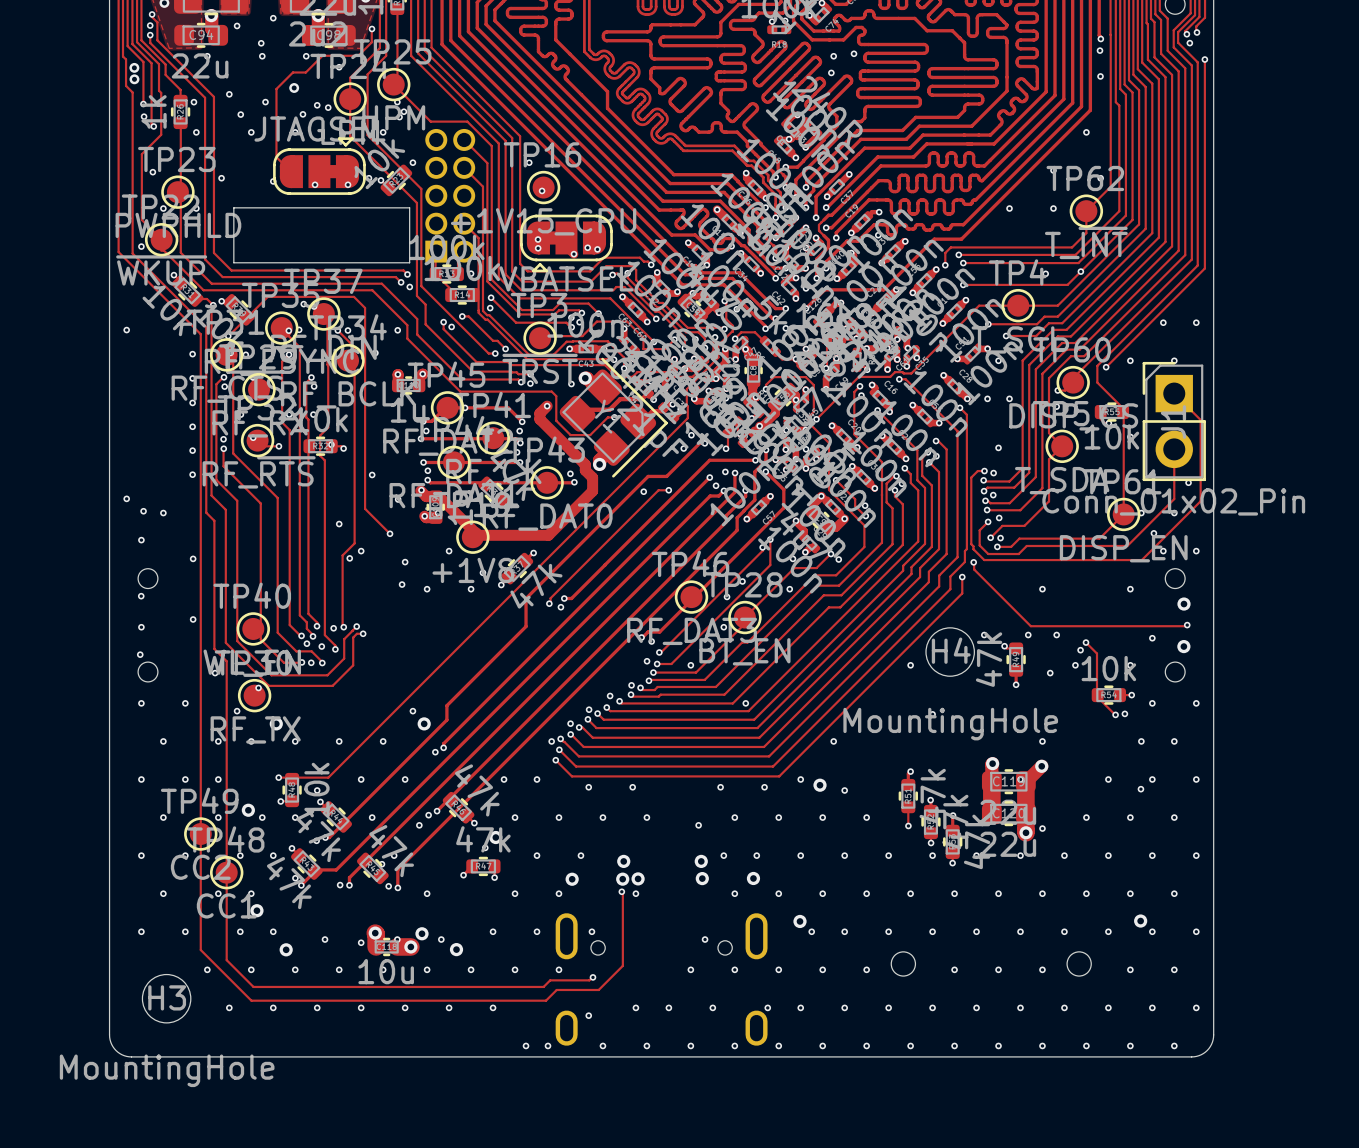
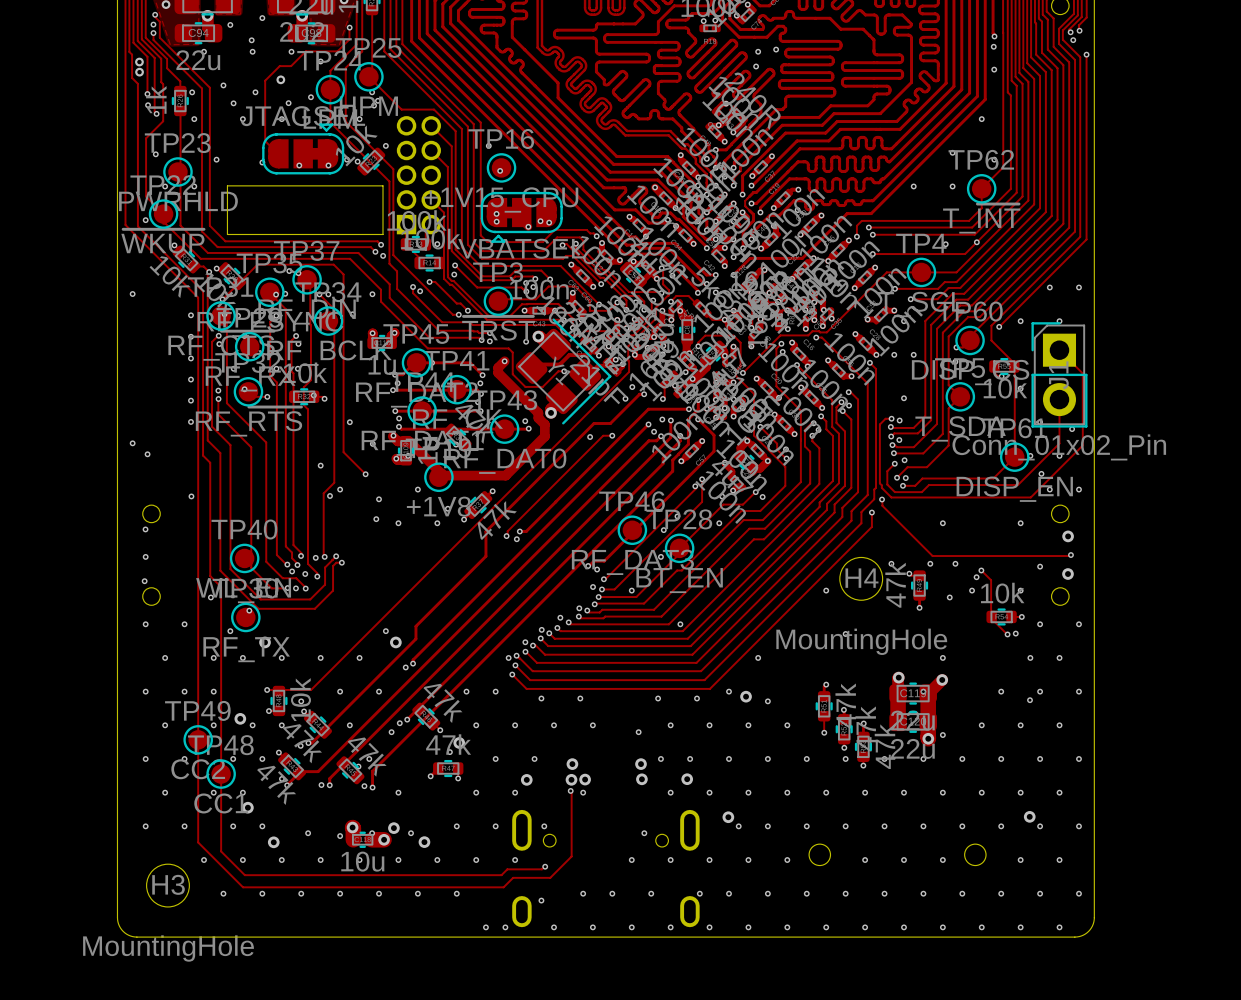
via: (317, 105) -> none
via: (163, 513) -> none
via: (141, 540) -> none
via: (193, 619) -> none

